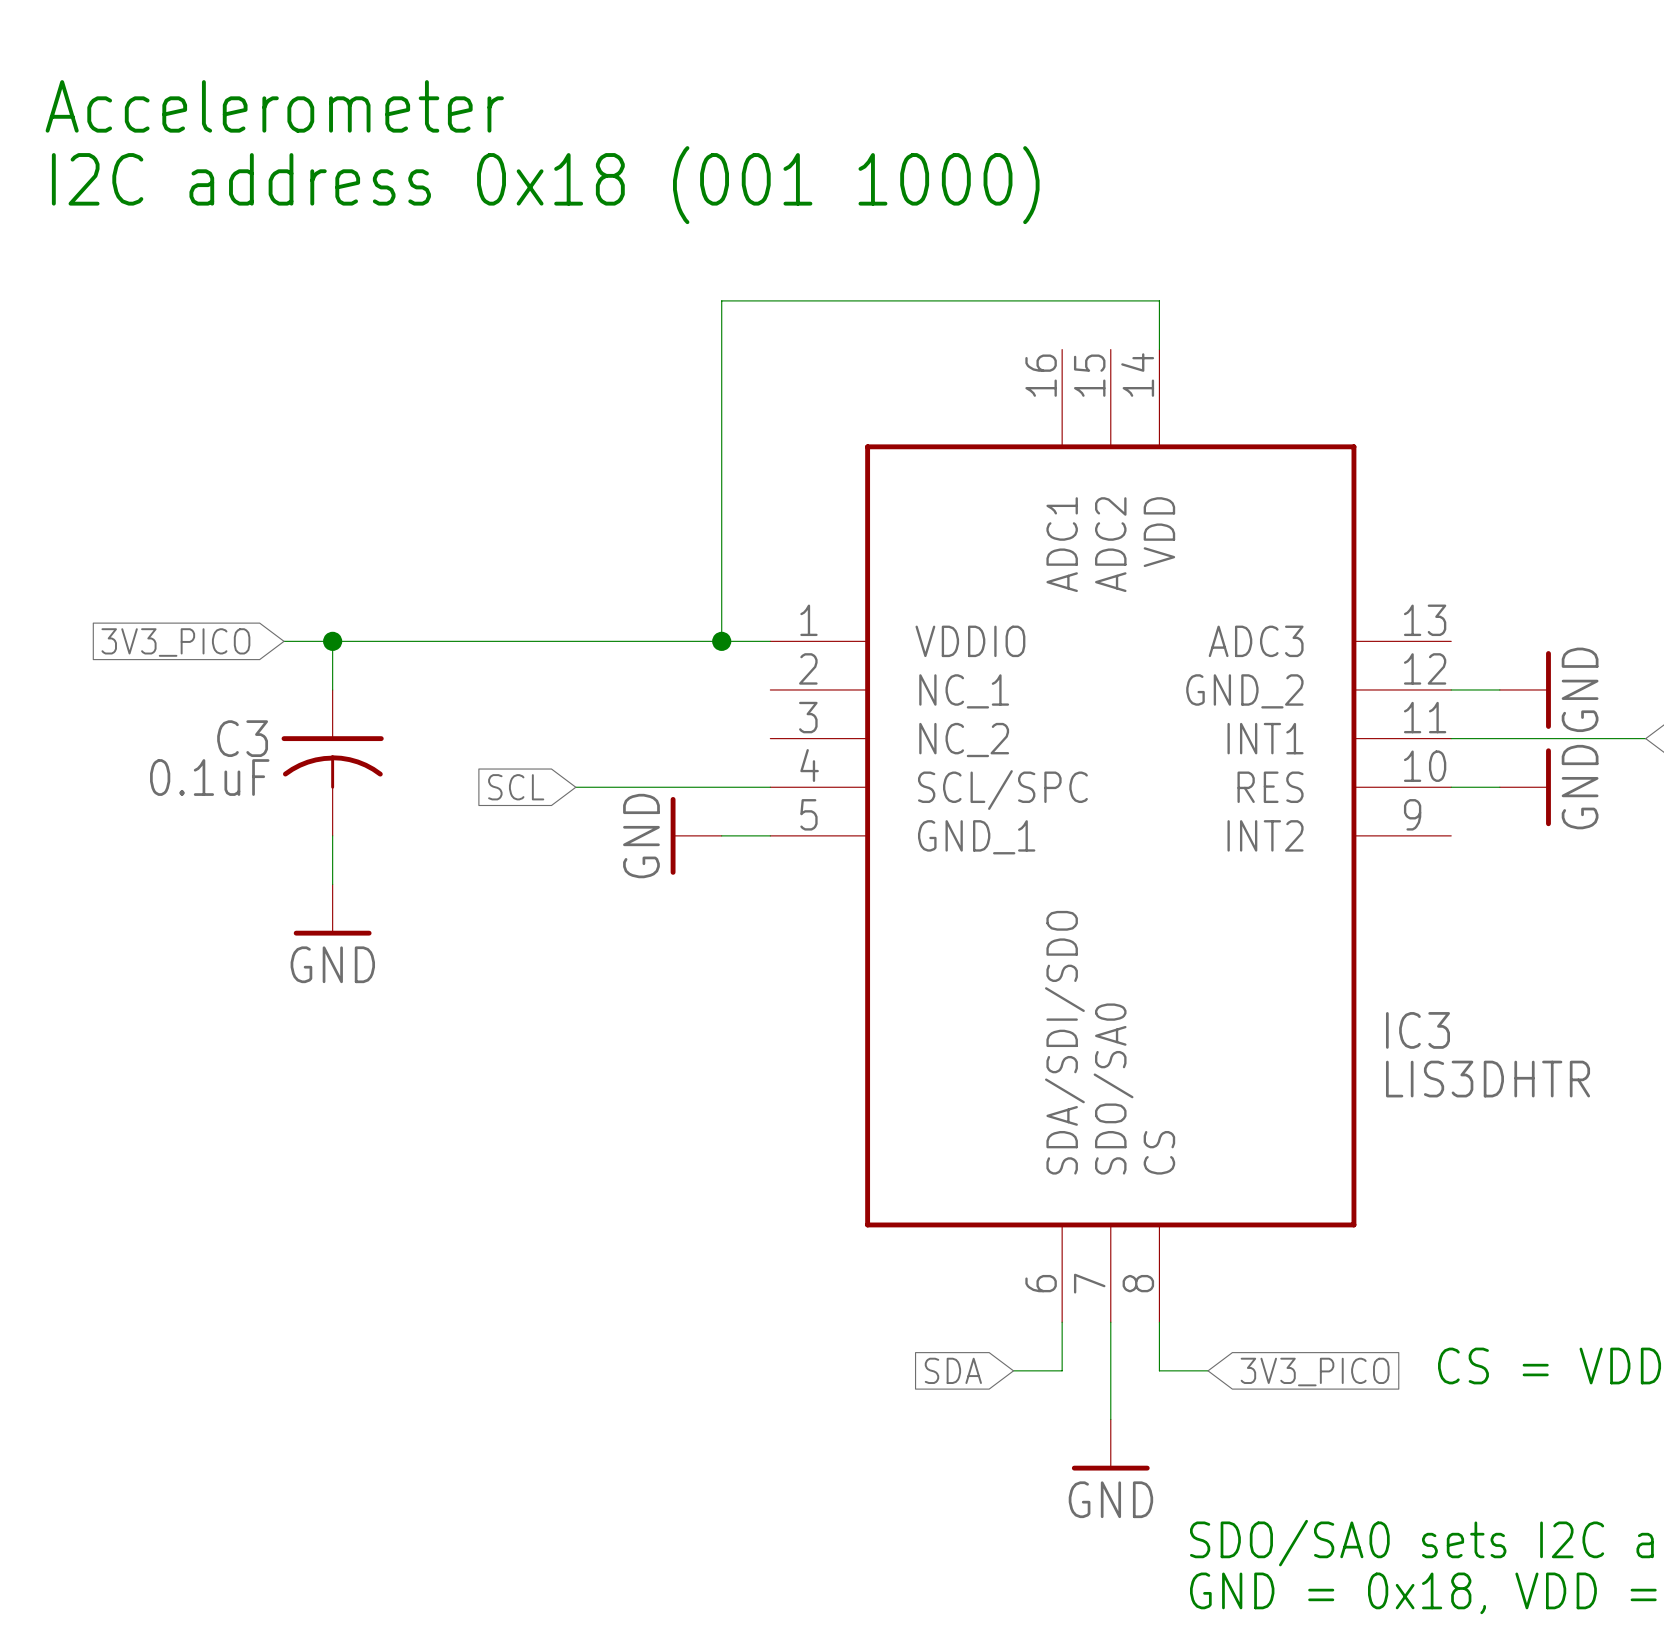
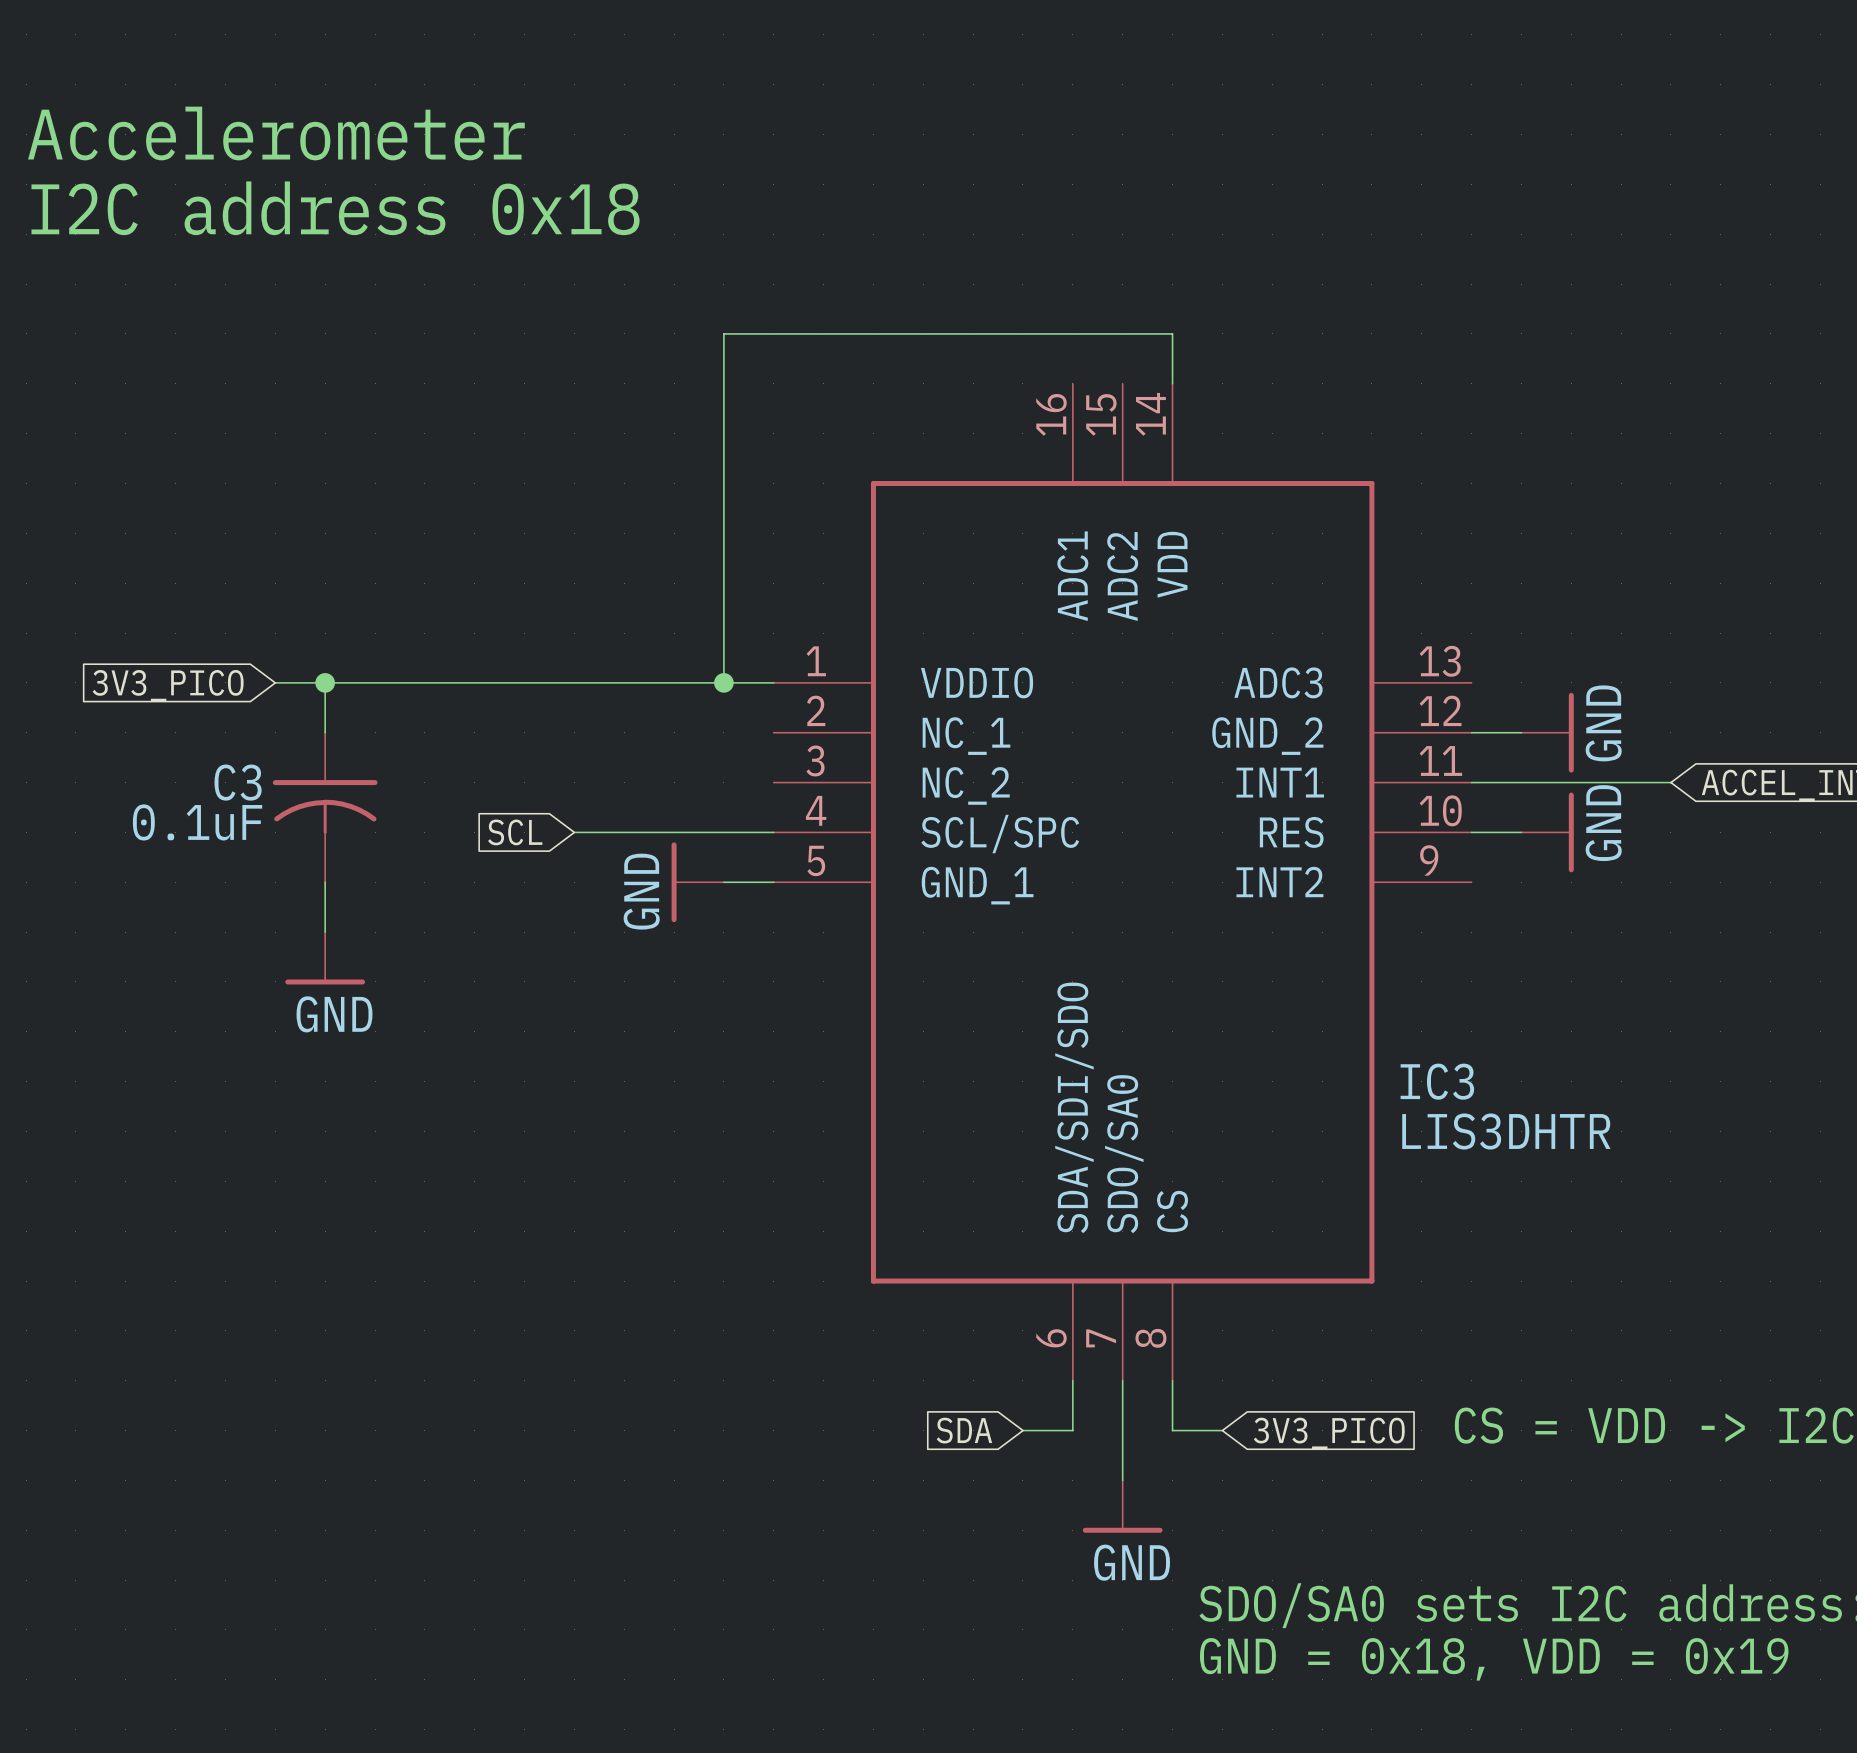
text: I2C address 0x18 (001 1000) (545, 185) -> I2C address 0x18 (335, 208)

